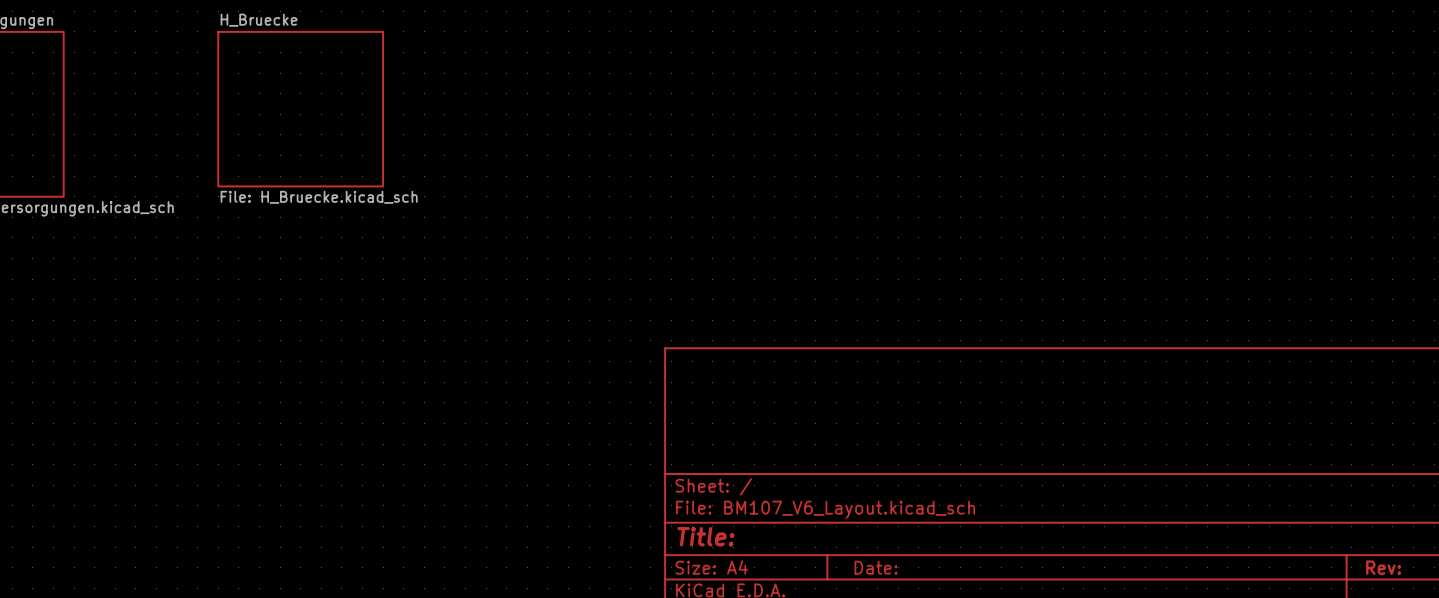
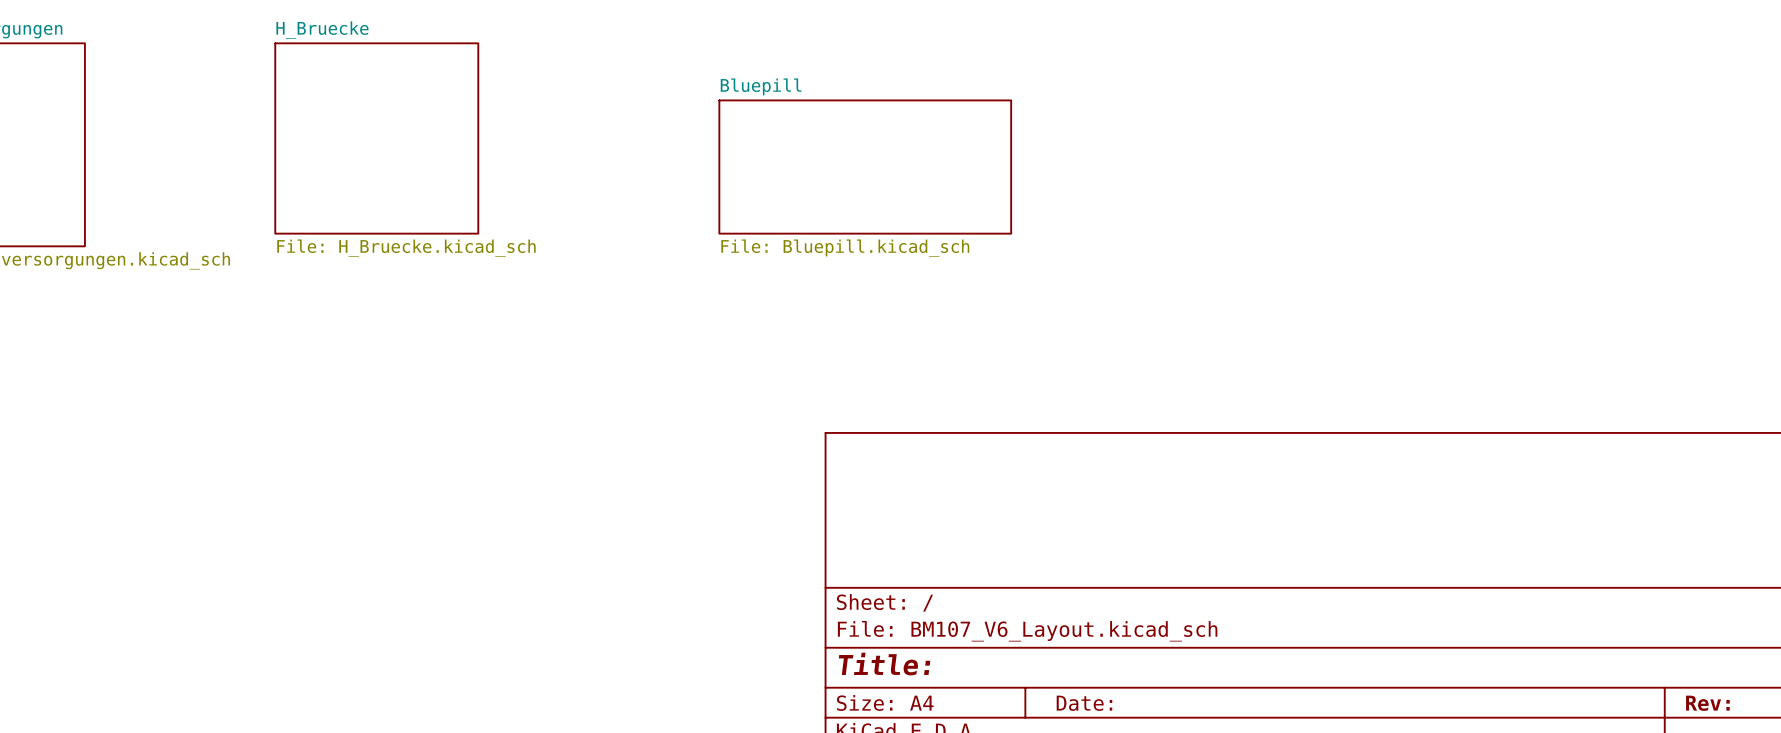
sheet Bluepill: none -> File: Bluepill.kicad_sch (865, 167)

